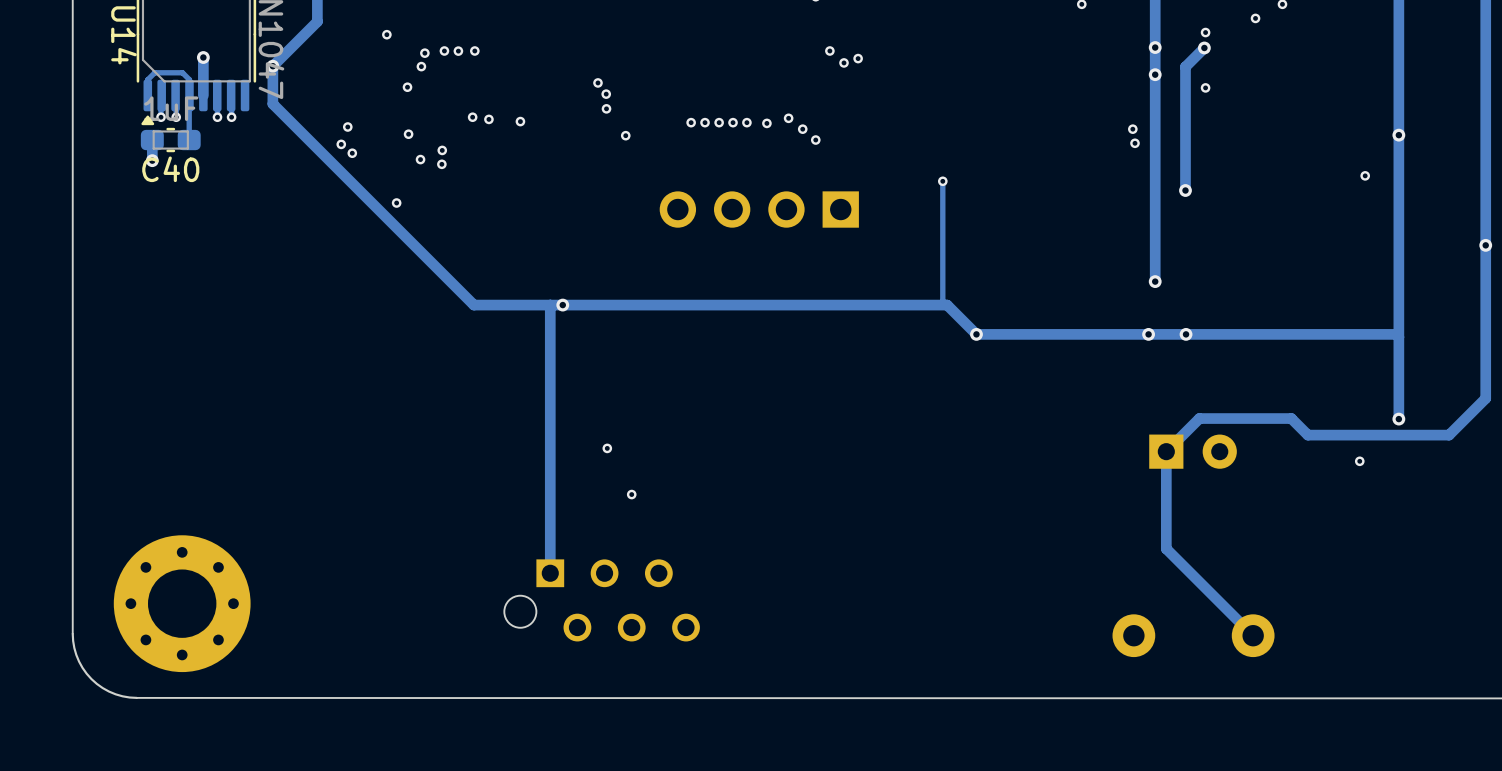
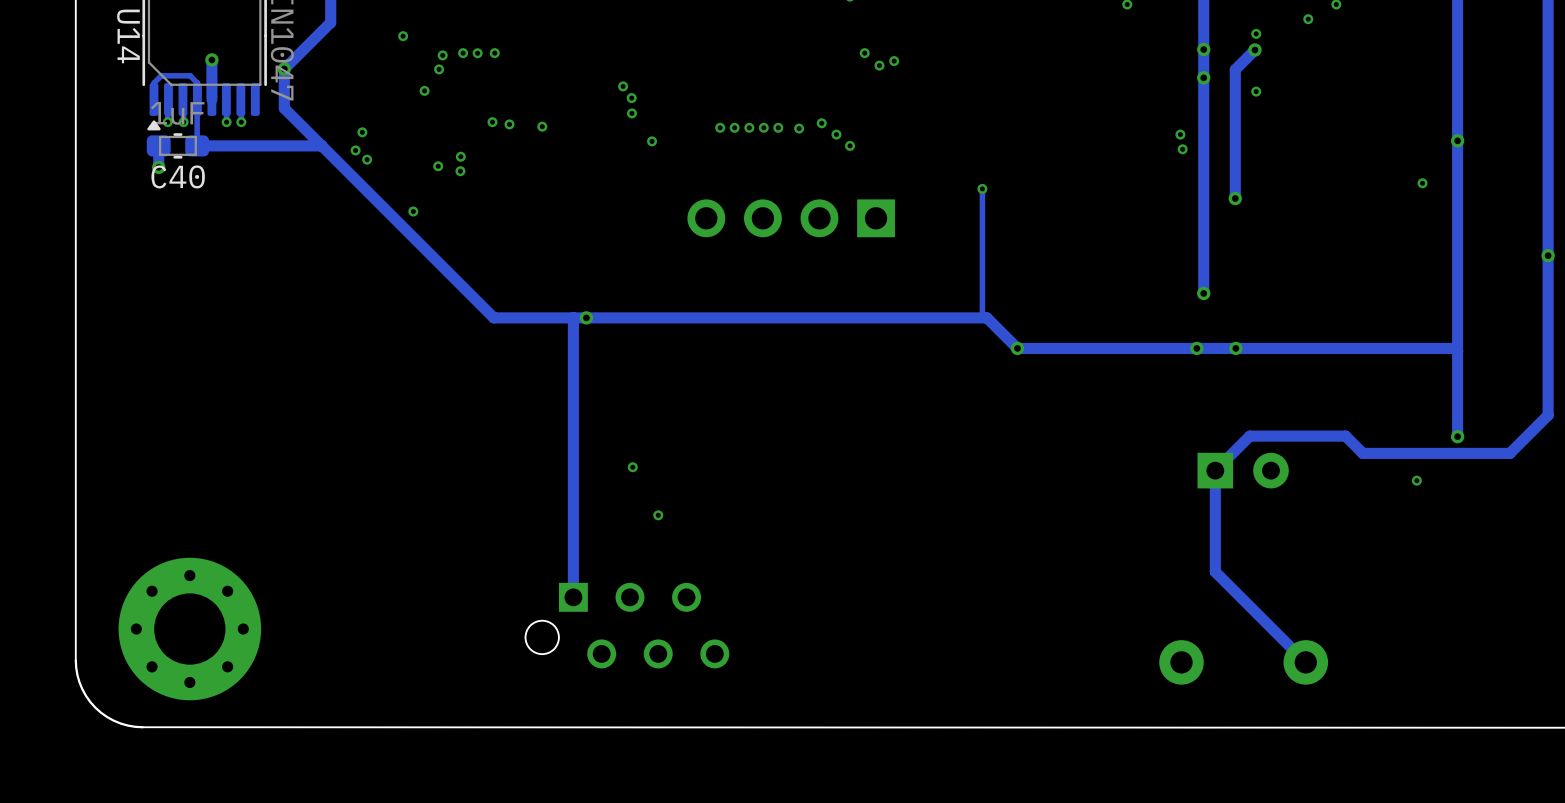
via: (408, 134) -> none
track: none -> (321, 145) (197, 145)

